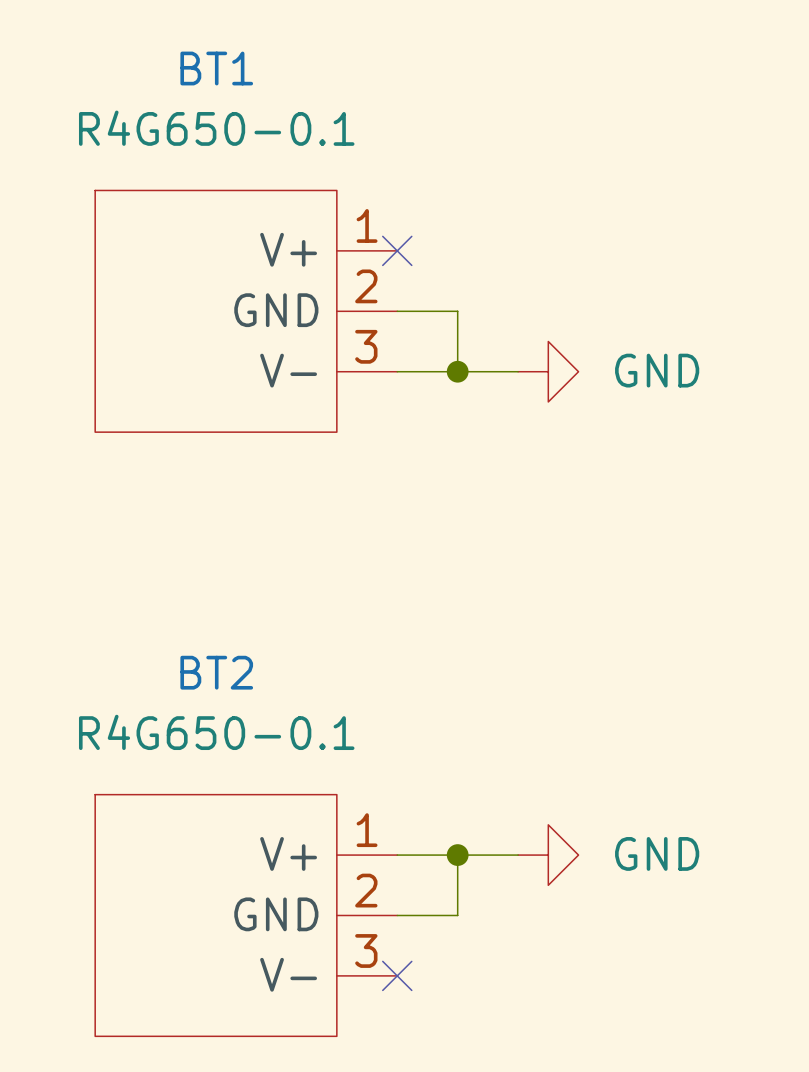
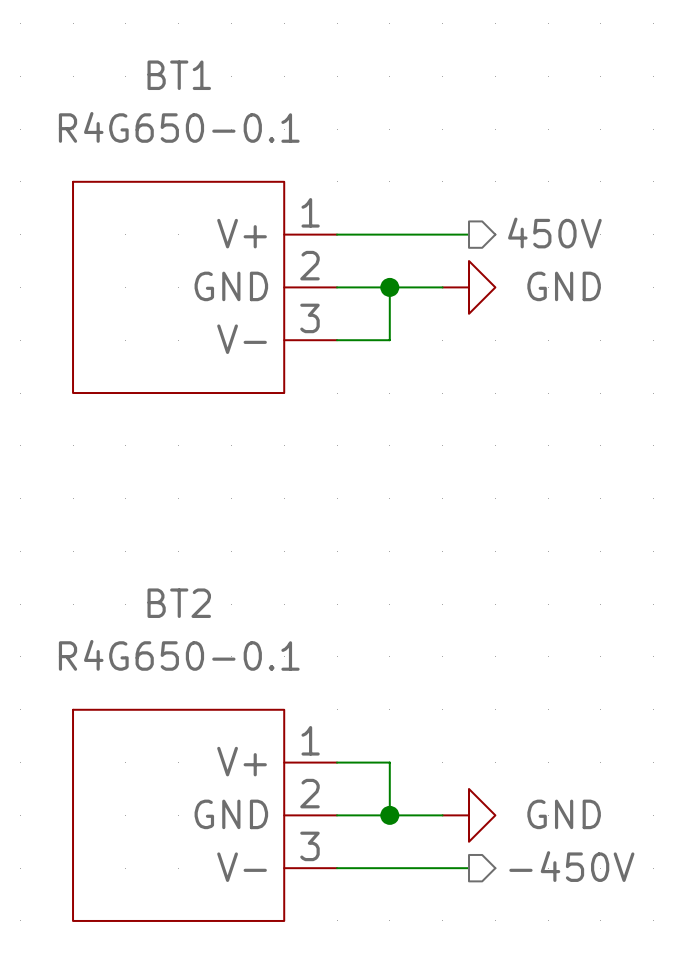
hierarchical label: none -> 450V (554, 232)
wire: none -> (337, 234) (469, 234)
no-connect mark: (397, 250) -> none
wire: (457, 371) (518, 371) -> (389, 287) (442, 287)
junction position: (457, 371) -> (389, 287)
power symbol position: GND (548, 371) -> GND (469, 287)
wire: (457, 855) (518, 855) -> (389, 815) (442, 815)
junction position: (457, 855) -> (389, 815)
power symbol position: GND (548, 855) -> GND (469, 815)
hierarchical label: none -> -450V (571, 866)
wire: none -> (337, 868) (469, 868)
no-connect mark: (397, 975) -> none

